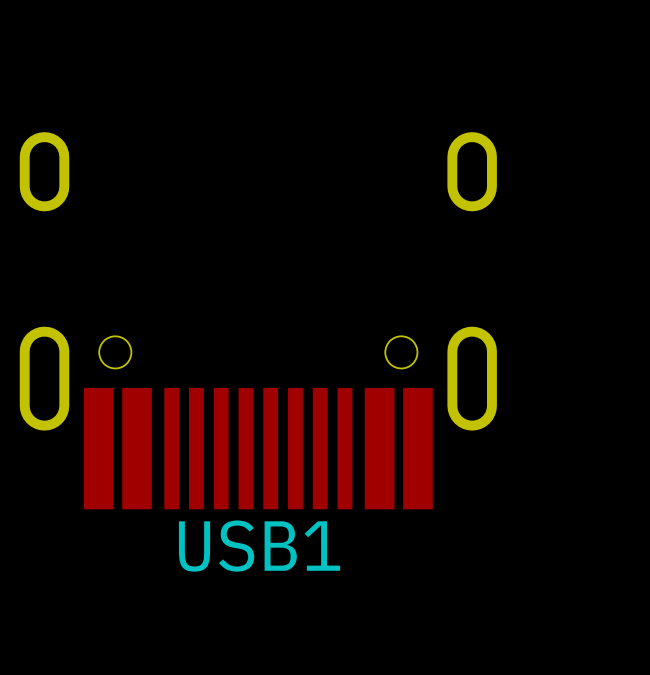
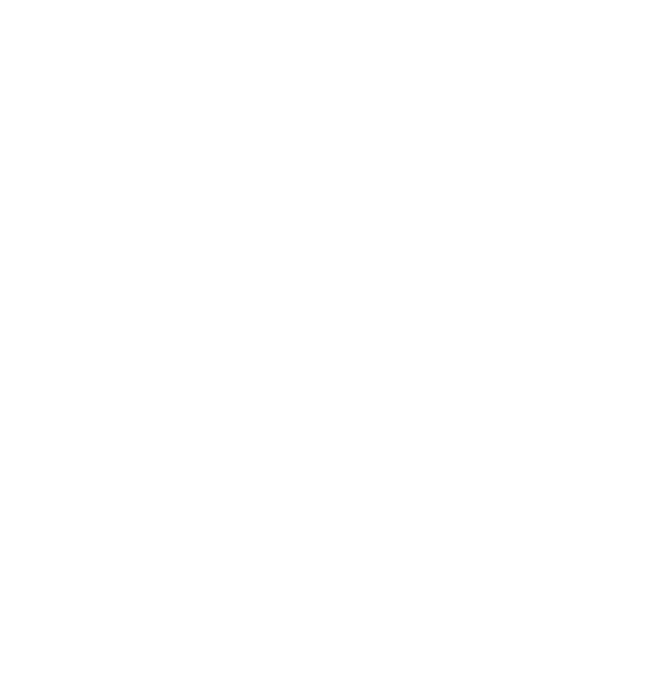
USB1: (258, 320) -> none

